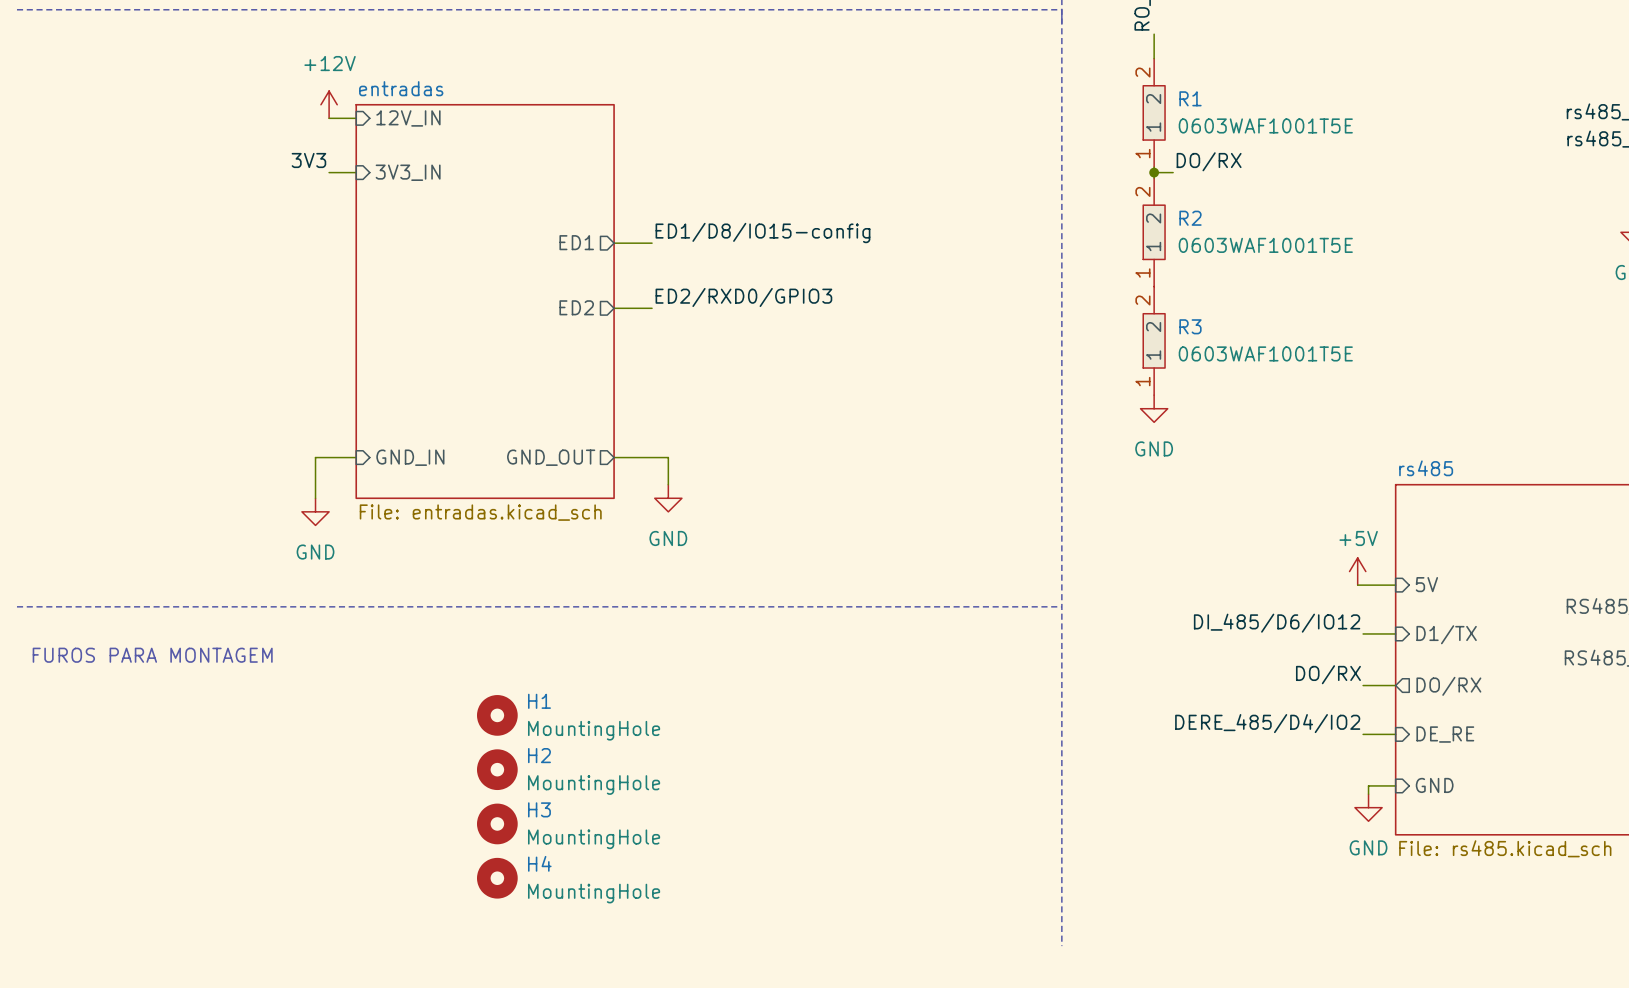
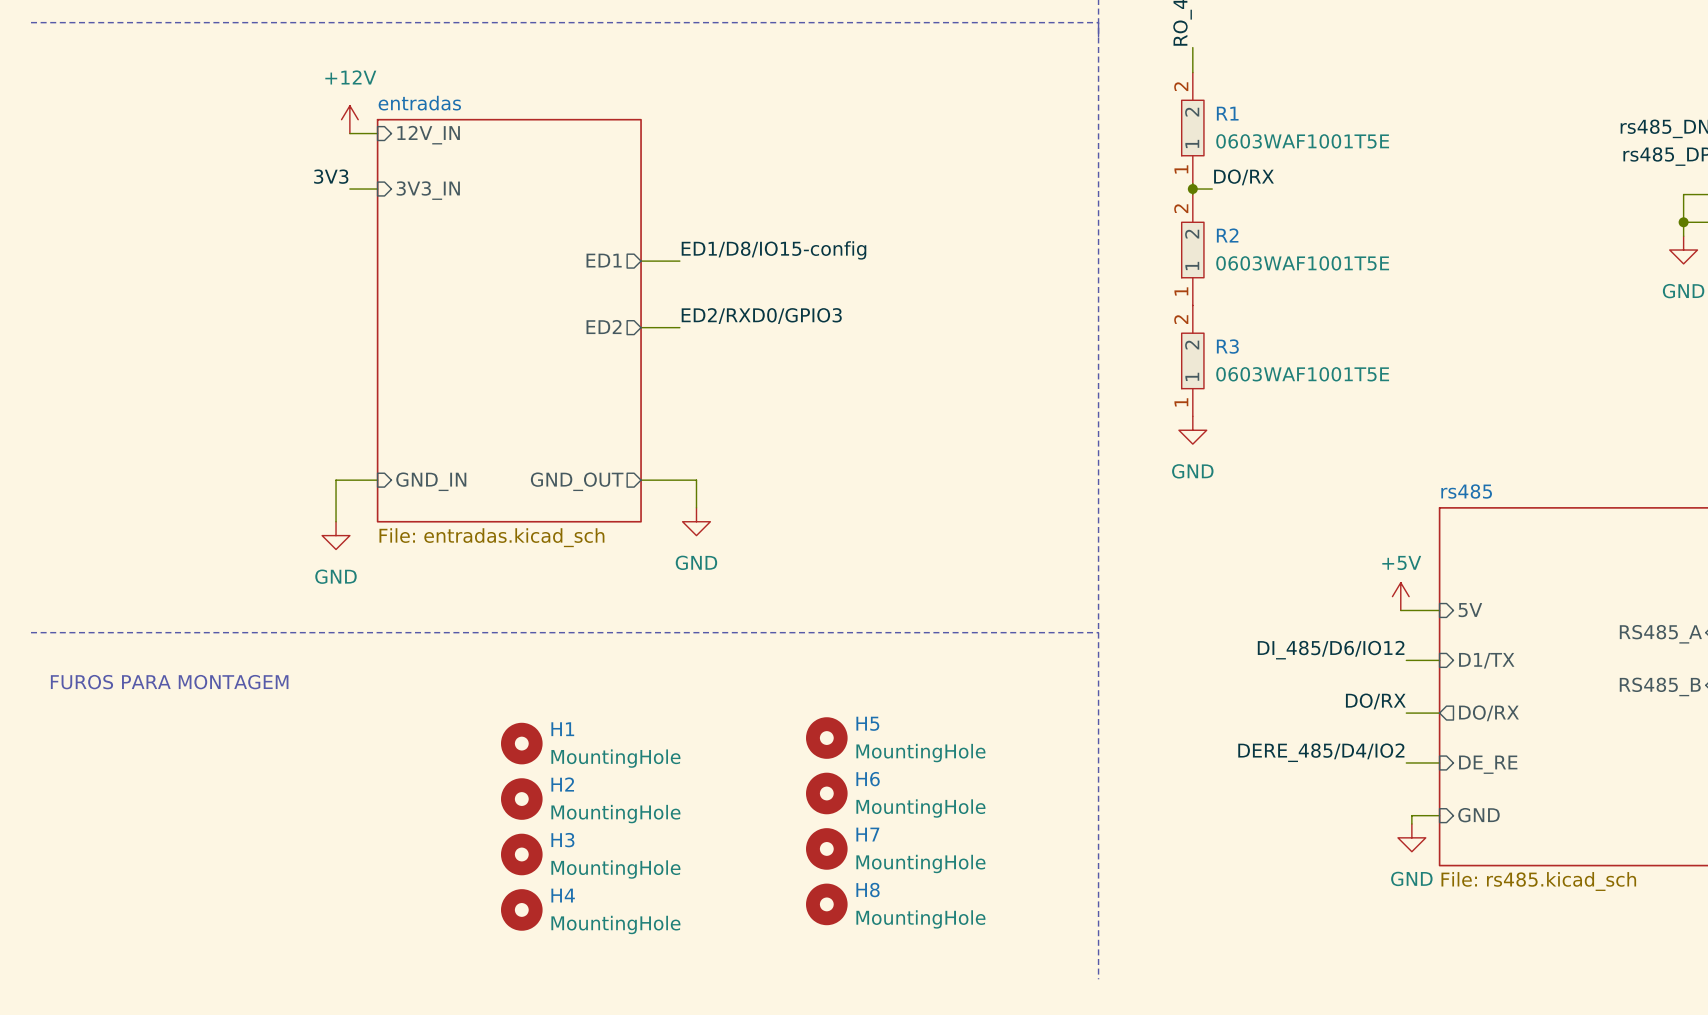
H5: none -> MountingHole (826, 738)
H6: none -> MountingHole (826, 793)
H7: none -> MountingHole (826, 848)
H8: none -> MountingHole (826, 904)

